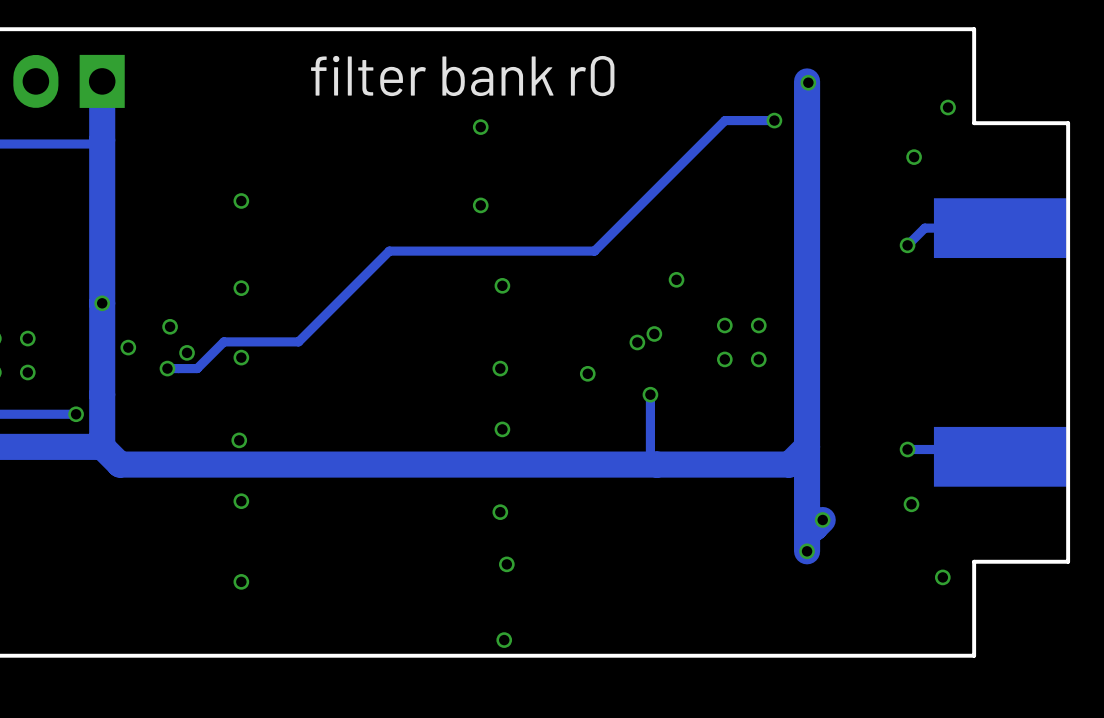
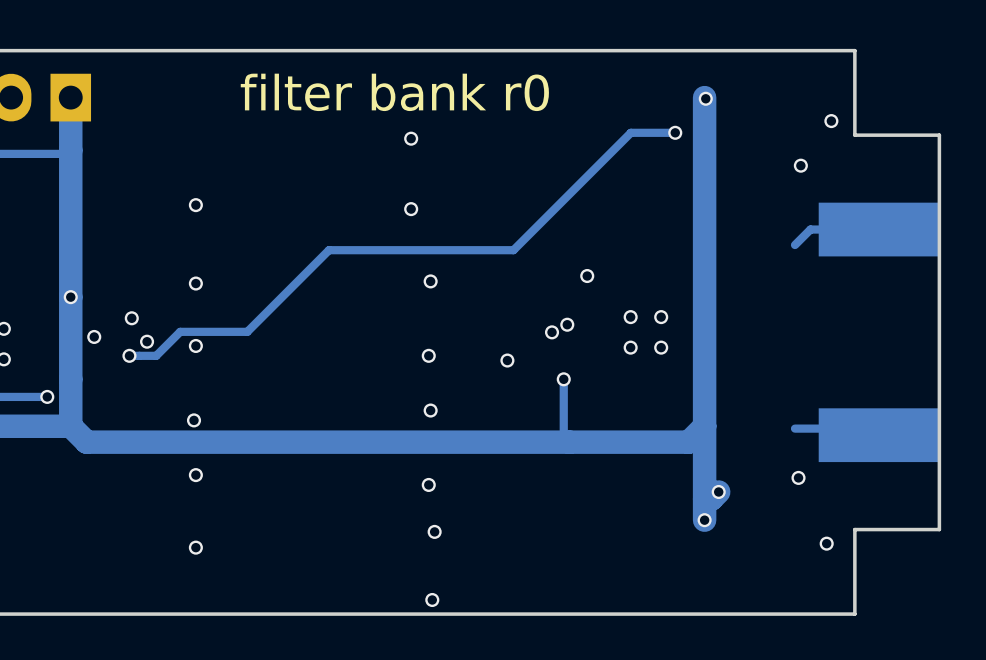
via: (907, 245) -> none
via: (907, 449) -> none

